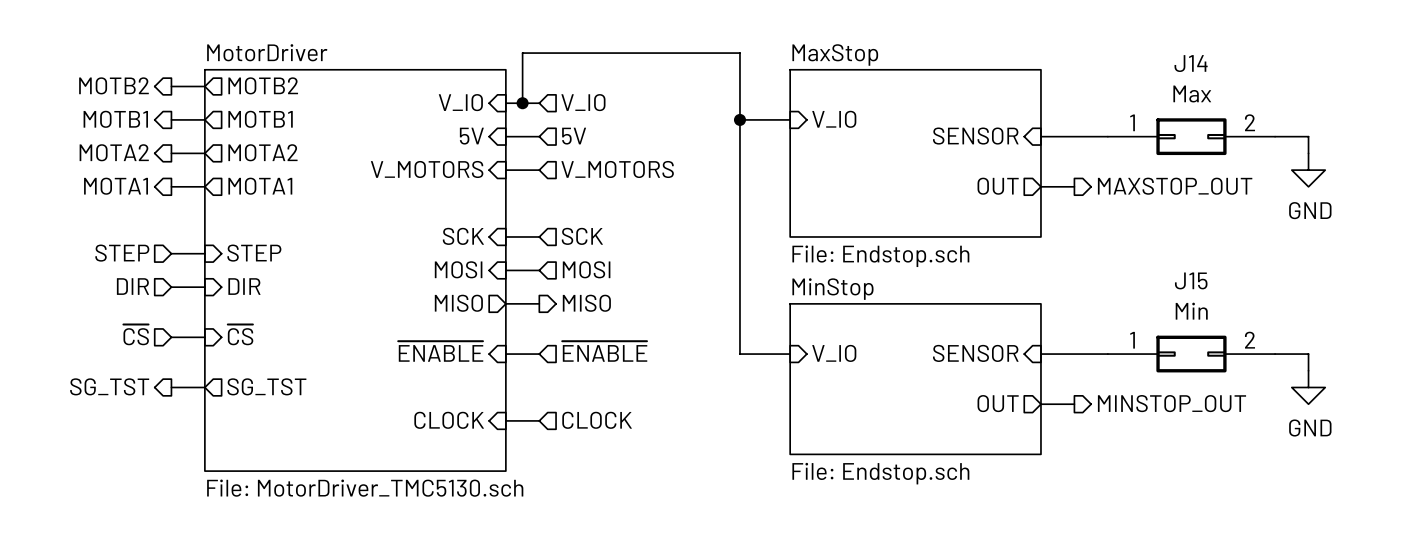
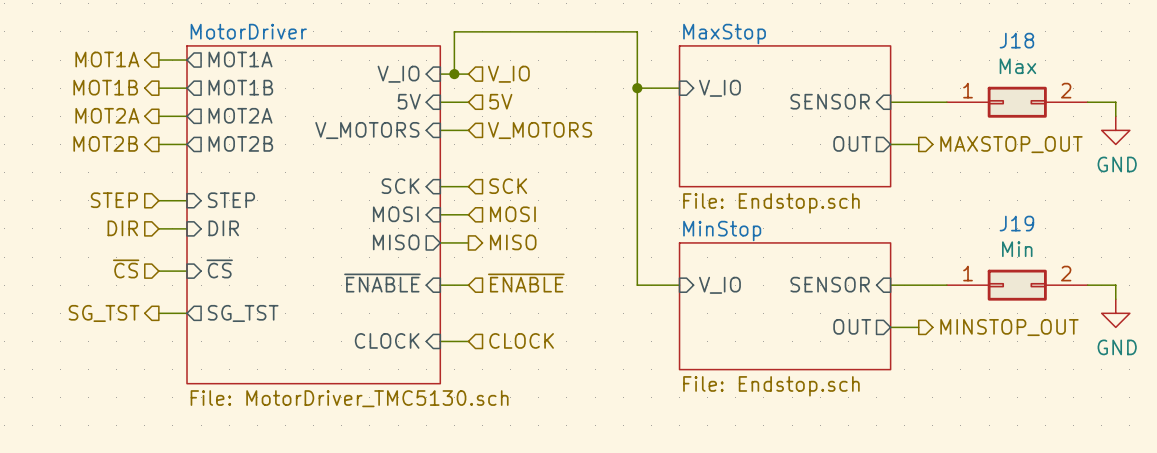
J14 name: J14 (1191, 63) -> J18 (1016, 40)
hierarchical label: MOTB2 (113, 85) -> MOT1A (107, 59)
sheet pin: MOTB2 (263, 85) -> MOT1A (240, 59)
hierarchical label: MOTB1 (115, 119) -> MOT1B (105, 87)
sheet pin: MOTB1 (260, 119) -> MOT1B (240, 87)
hierarchical label: MOTA2 (114, 152) -> MOT2A (107, 115)
sheet pin: MOTA2 (262, 152) -> MOT2A (240, 115)
hierarchical label: MOTA1 (116, 186) -> MOT2B (105, 143)
sheet pin: MOTA1 (260, 186) -> MOT2B (240, 143)
J15 name: J15 (1191, 280) -> J19 (1016, 223)

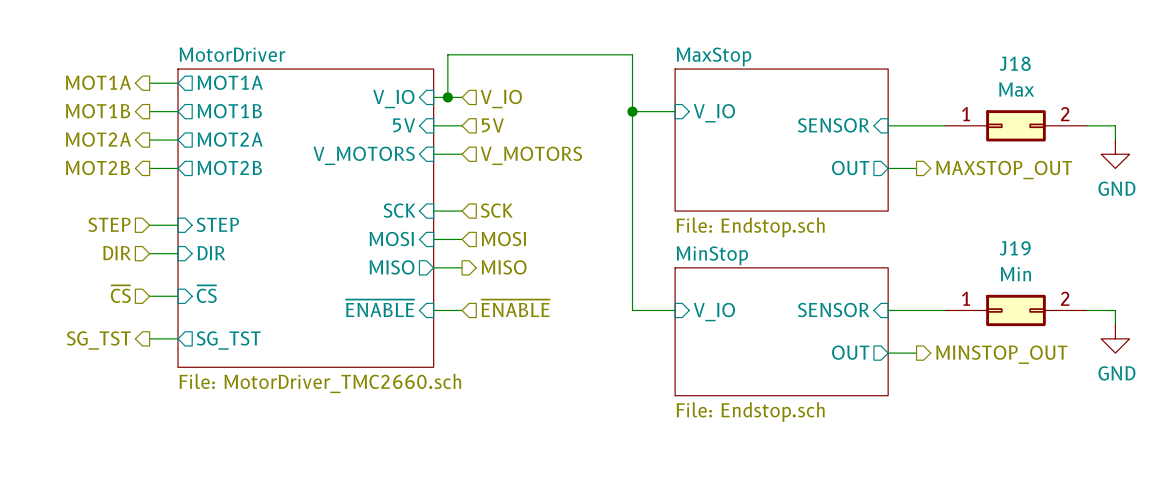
sheet MotorDriver: none -> File: MotorDriver_TMC2660.sch (305, 218)
sheet MotorDriver: File: MotorDriver_TMC5130.sch (313, 214) -> none
sheet pin: CLOCK (387, 340) -> none
hierarchical label: CLOCK (521, 340) -> none
wire: (440, 341) (468, 341) -> none

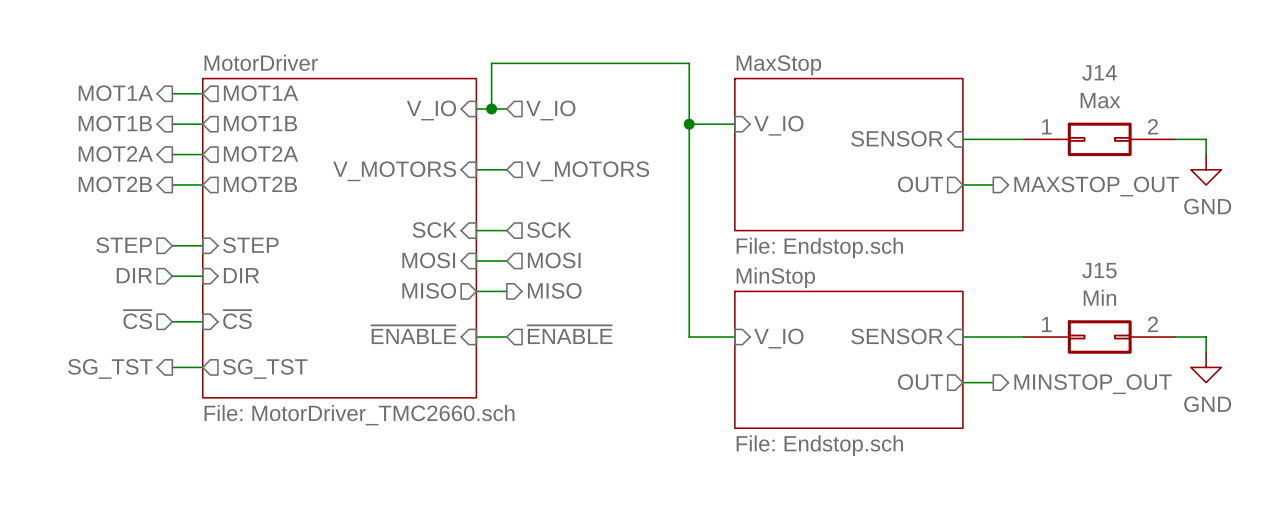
J18 name: J18 (1015, 63) -> J14 (1099, 72)
sheet pin: 5V (404, 125) -> none
wire: (433, 125) (462, 125) -> none
hierarchical label: 5V (492, 125) -> none
J19 name: J19 (1015, 248) -> J15 (1099, 270)

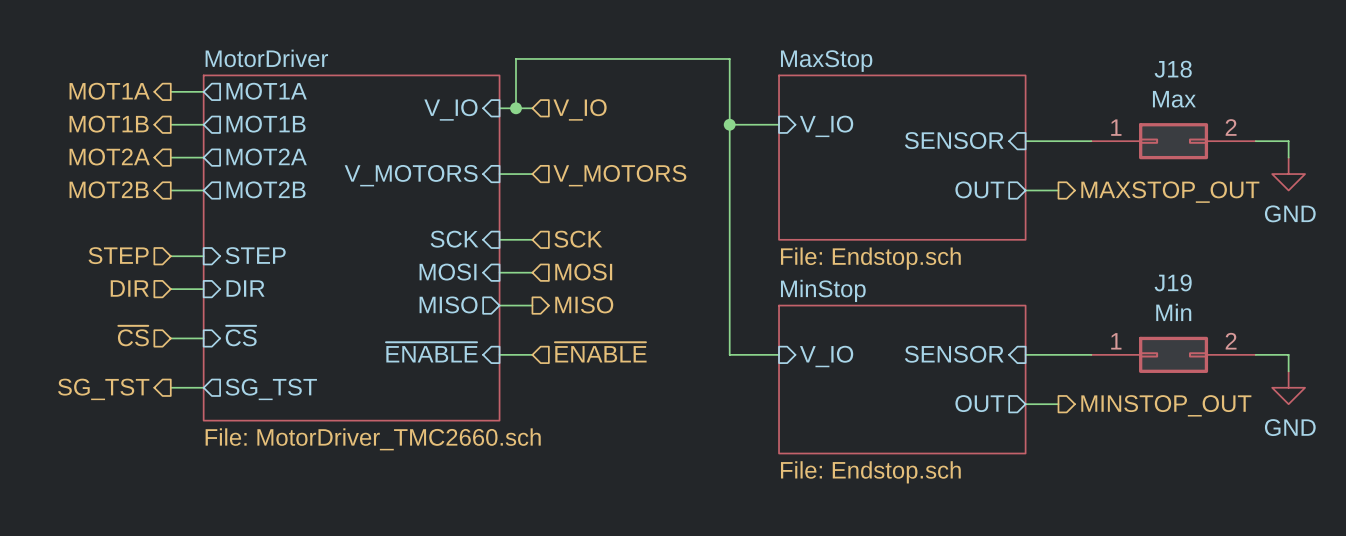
J14 name: J14 (1099, 72) -> J18 (1173, 69)
J15 name: J15 (1099, 270) -> J19 (1173, 282)

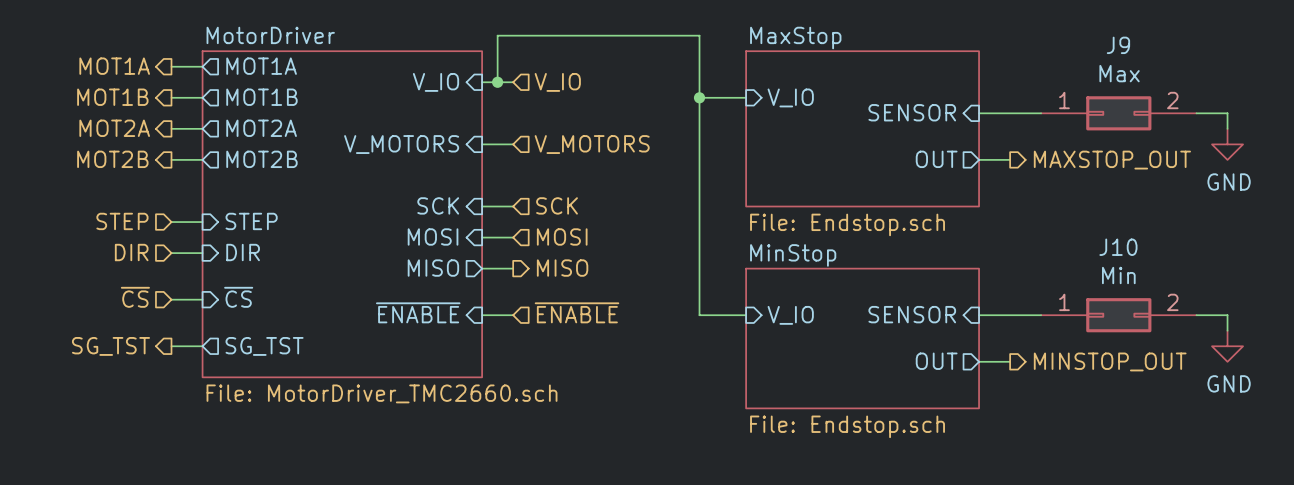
J18 name: J18 (1173, 69) -> J9 (1118, 45)
J19 name: J19 (1173, 282) -> J10 (1118, 247)

